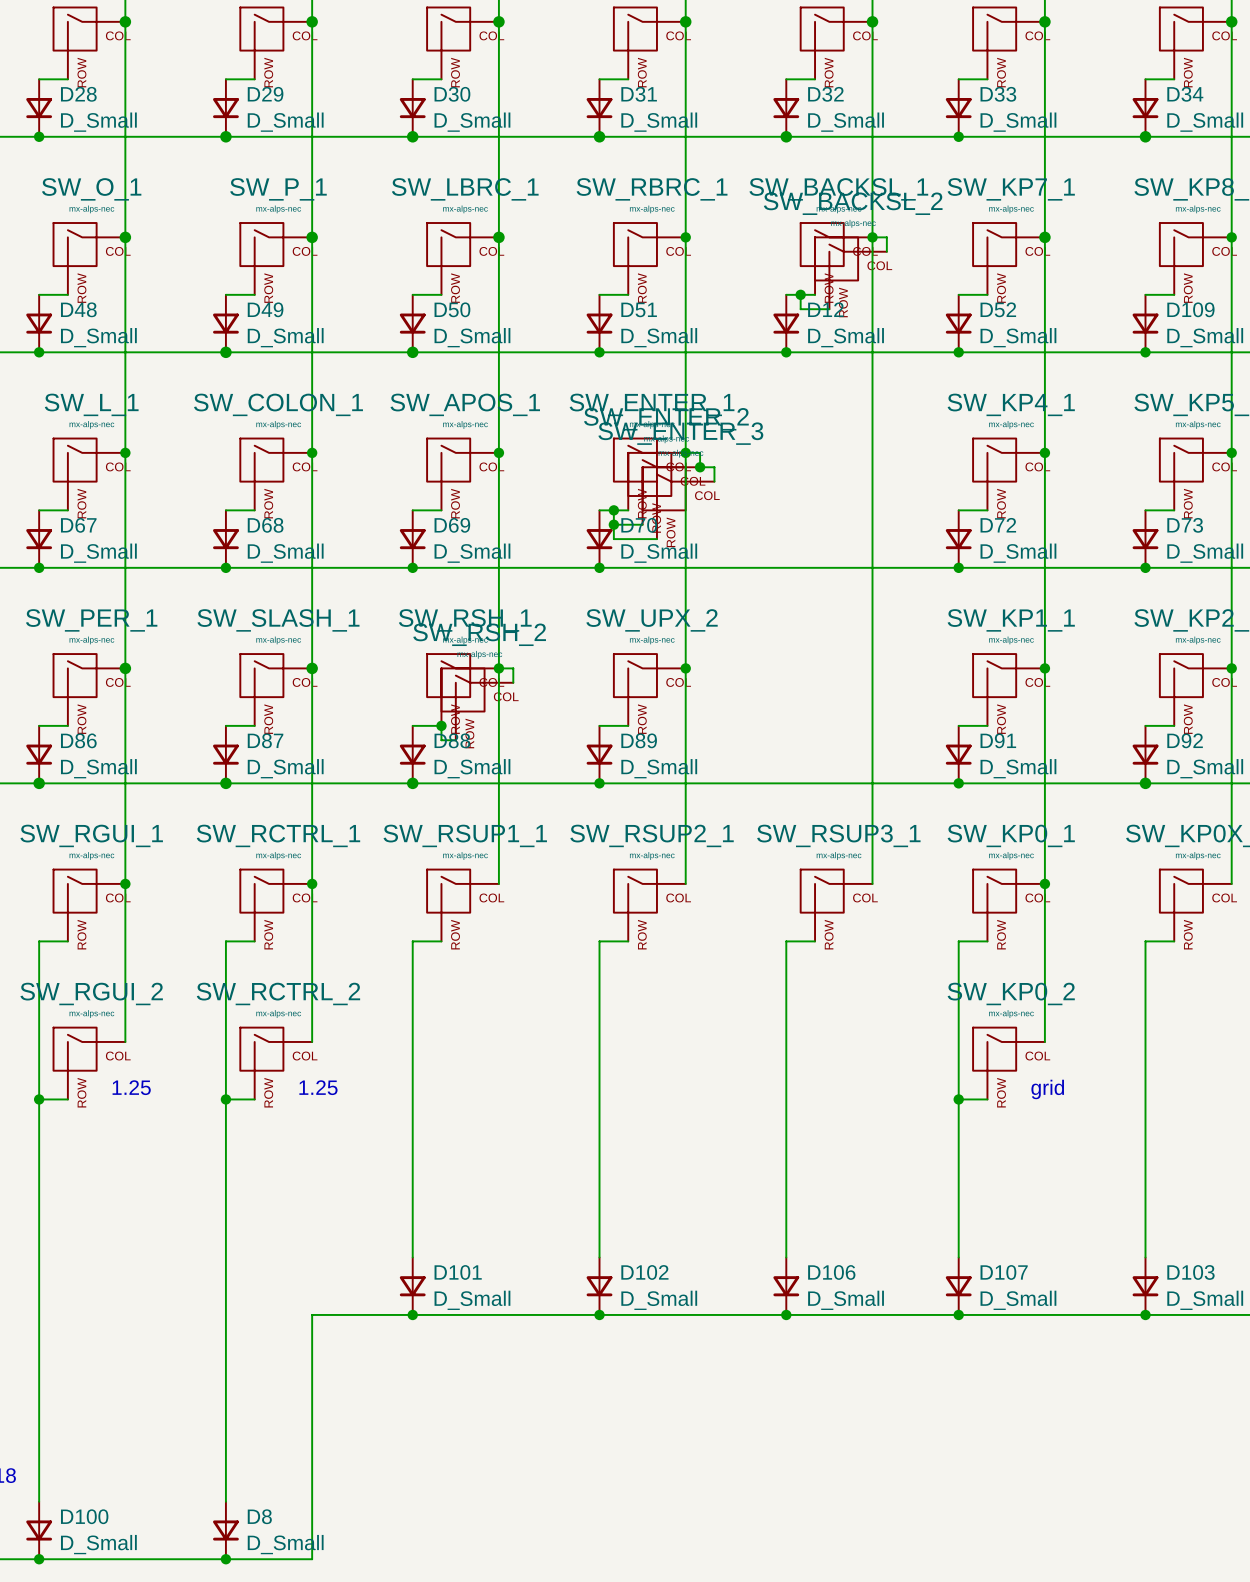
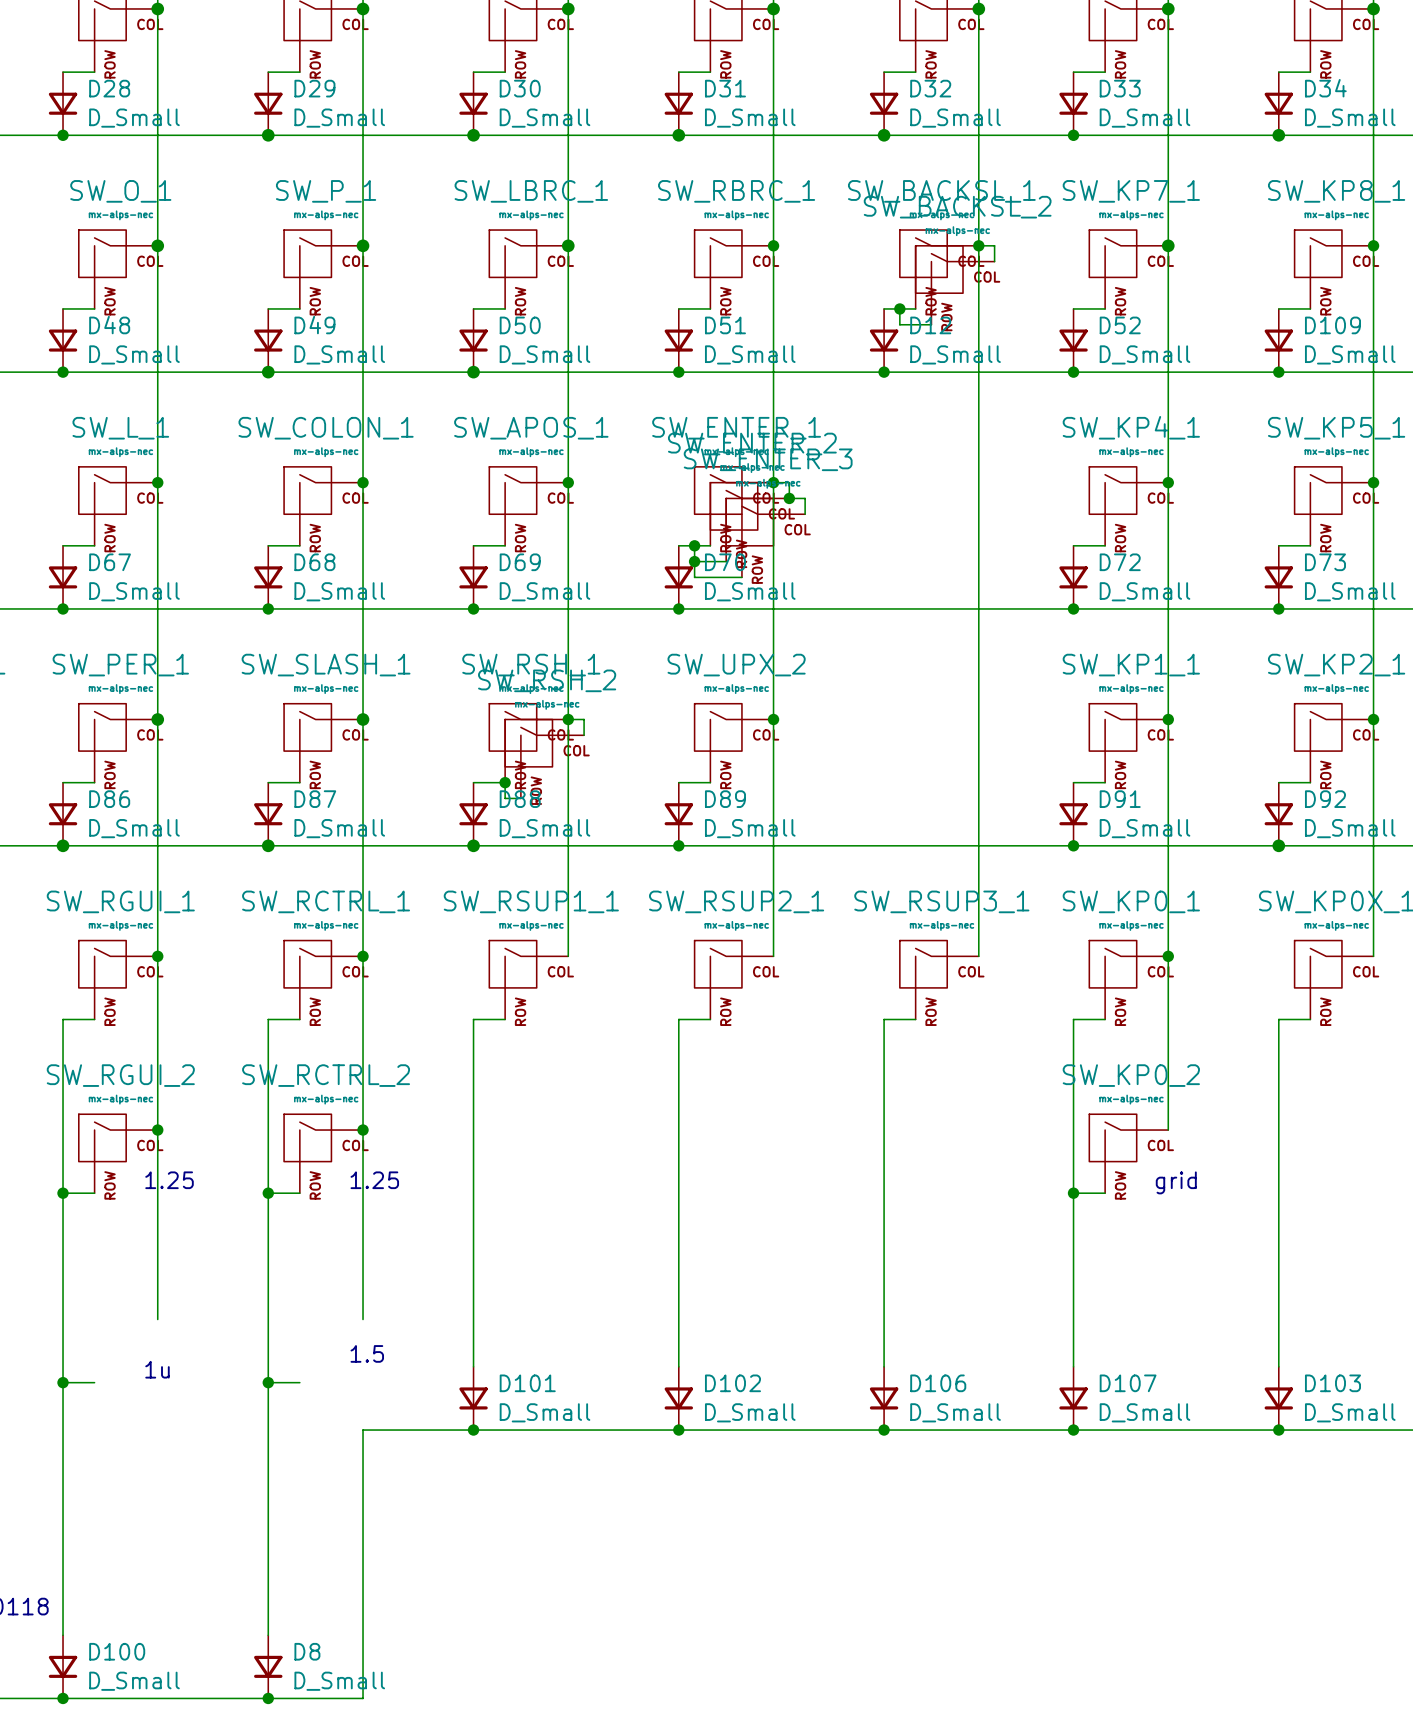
wire: none -> (157, 1130) (157, 1319)
junction: none -> (157, 1130)
wire: none -> (363, 1130) (363, 1319)
junction: none -> (363, 1130)
text: none -> 1.5 (367, 1353)
text: none -> 1u (157, 1369)
wire: none -> (63, 1382) (94, 1382)
junction: none -> (63, 1382)
wire: none -> (268, 1382) (299, 1382)
junction: none -> (268, 1382)

